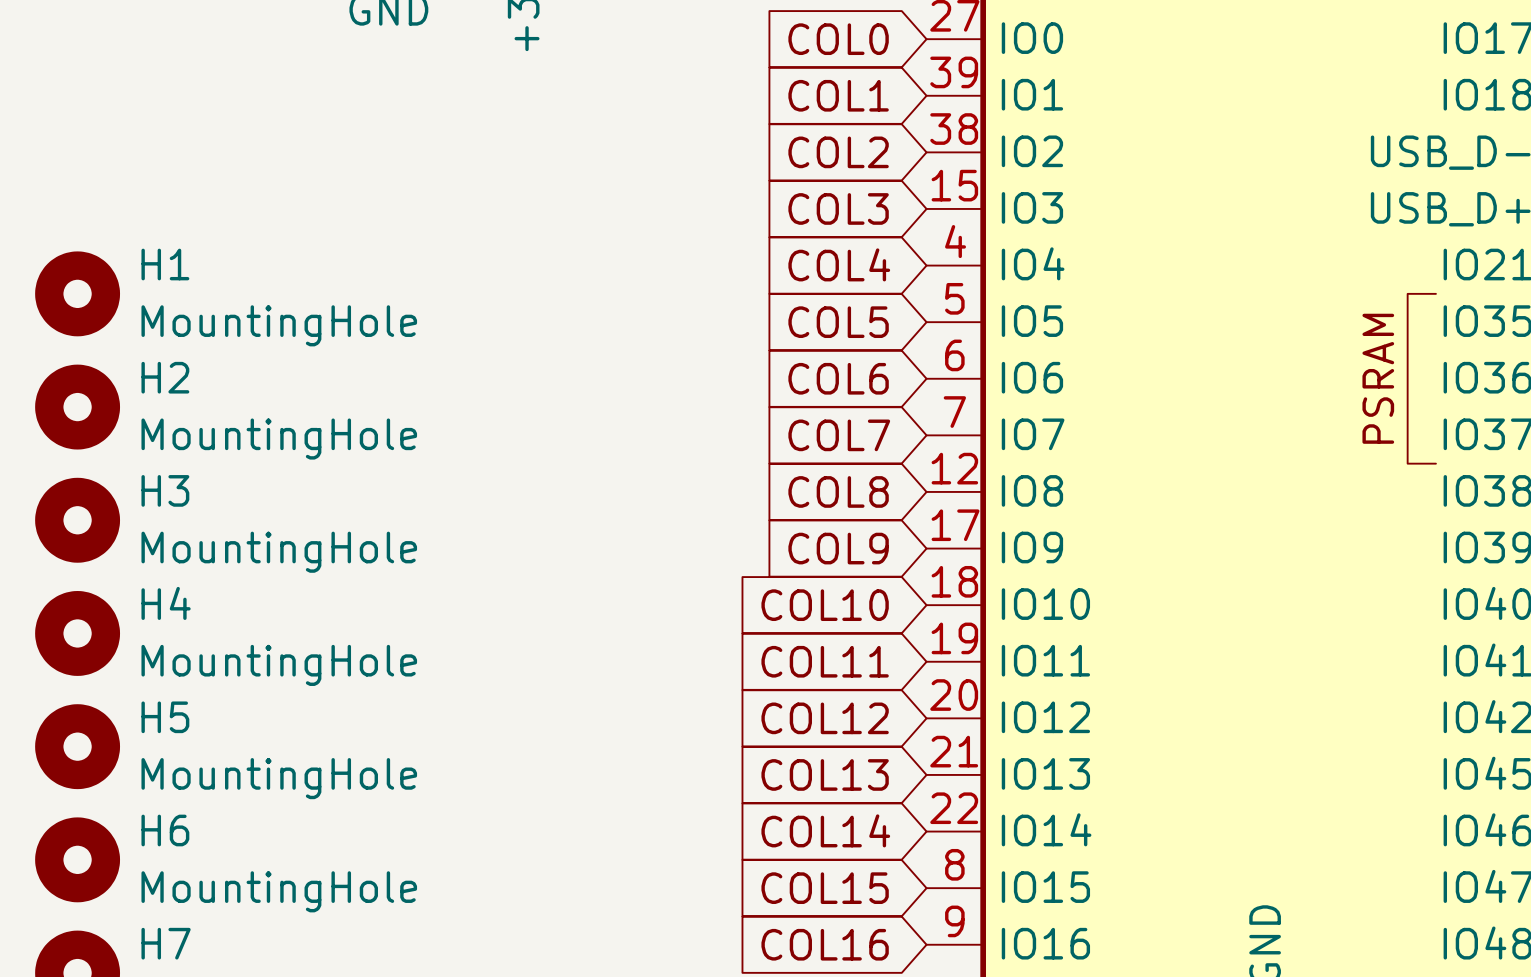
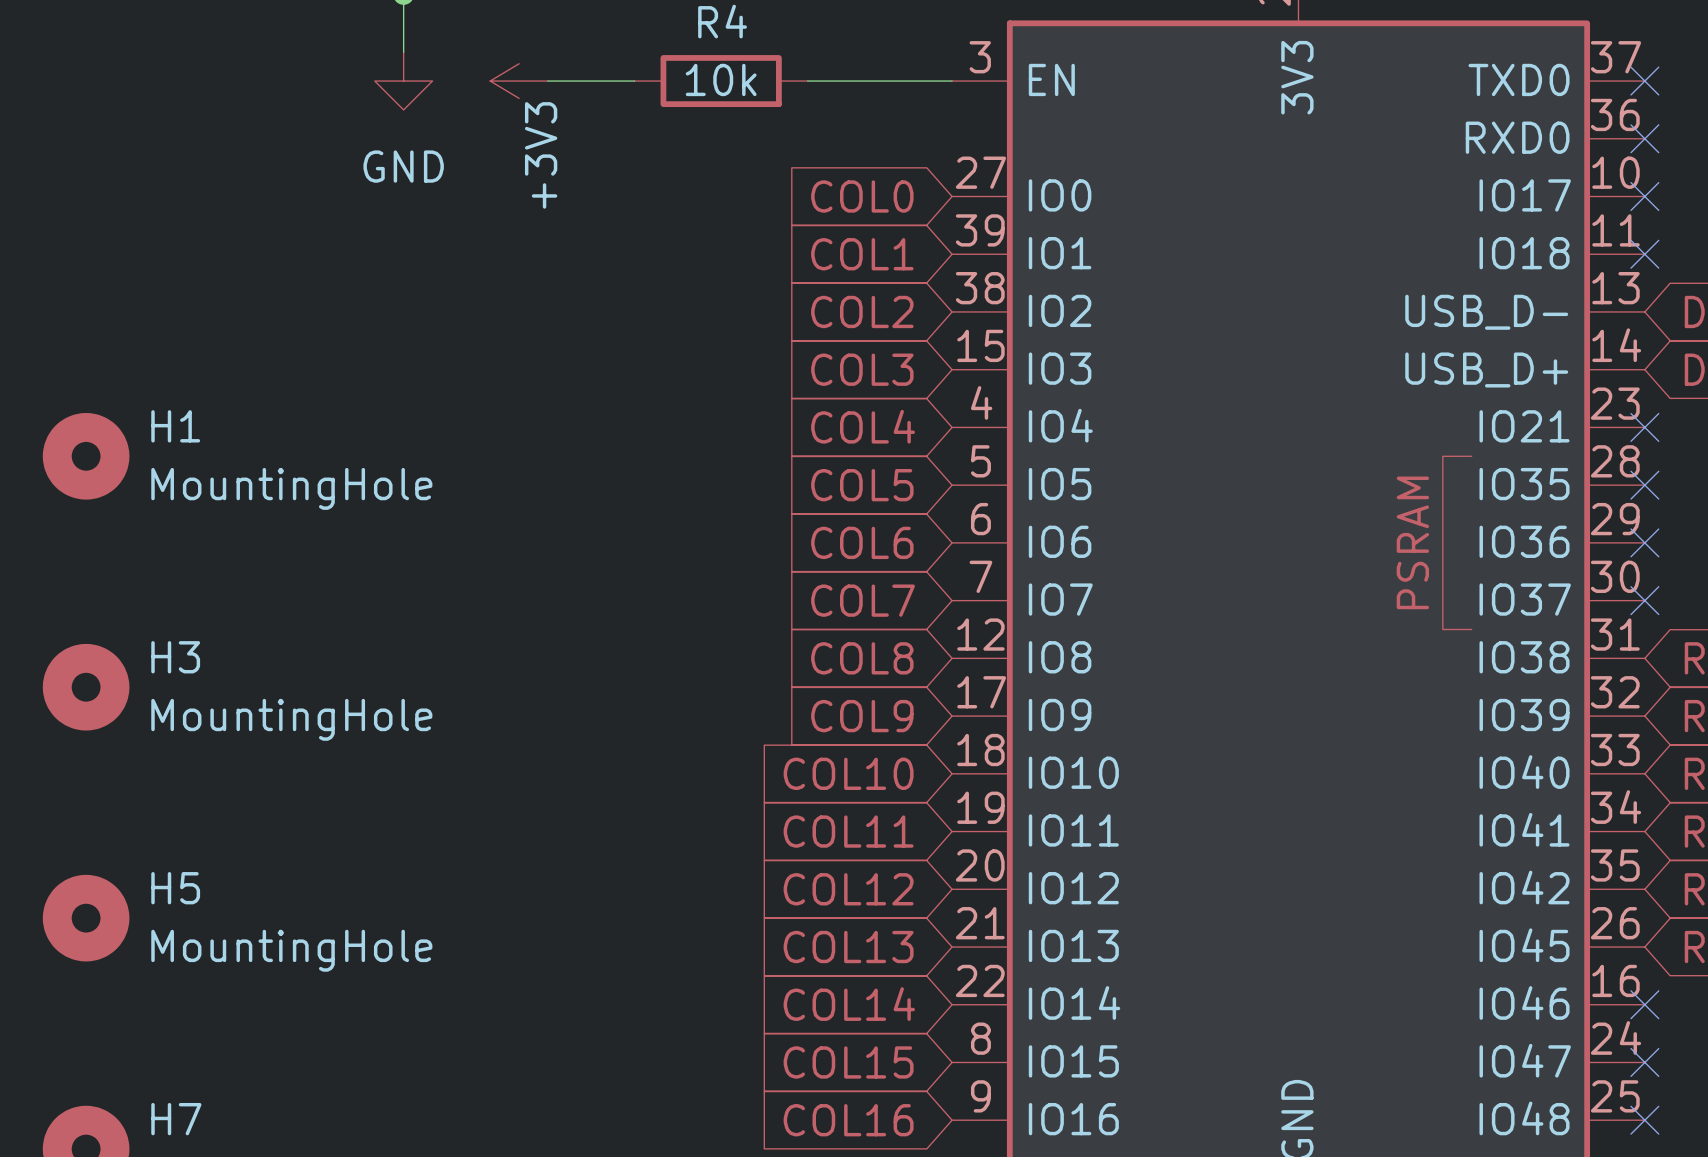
H2: MountingHole (77, 407) -> none
H4: MountingHole (77, 633) -> none
H6: MountingHole (77, 859) -> none

